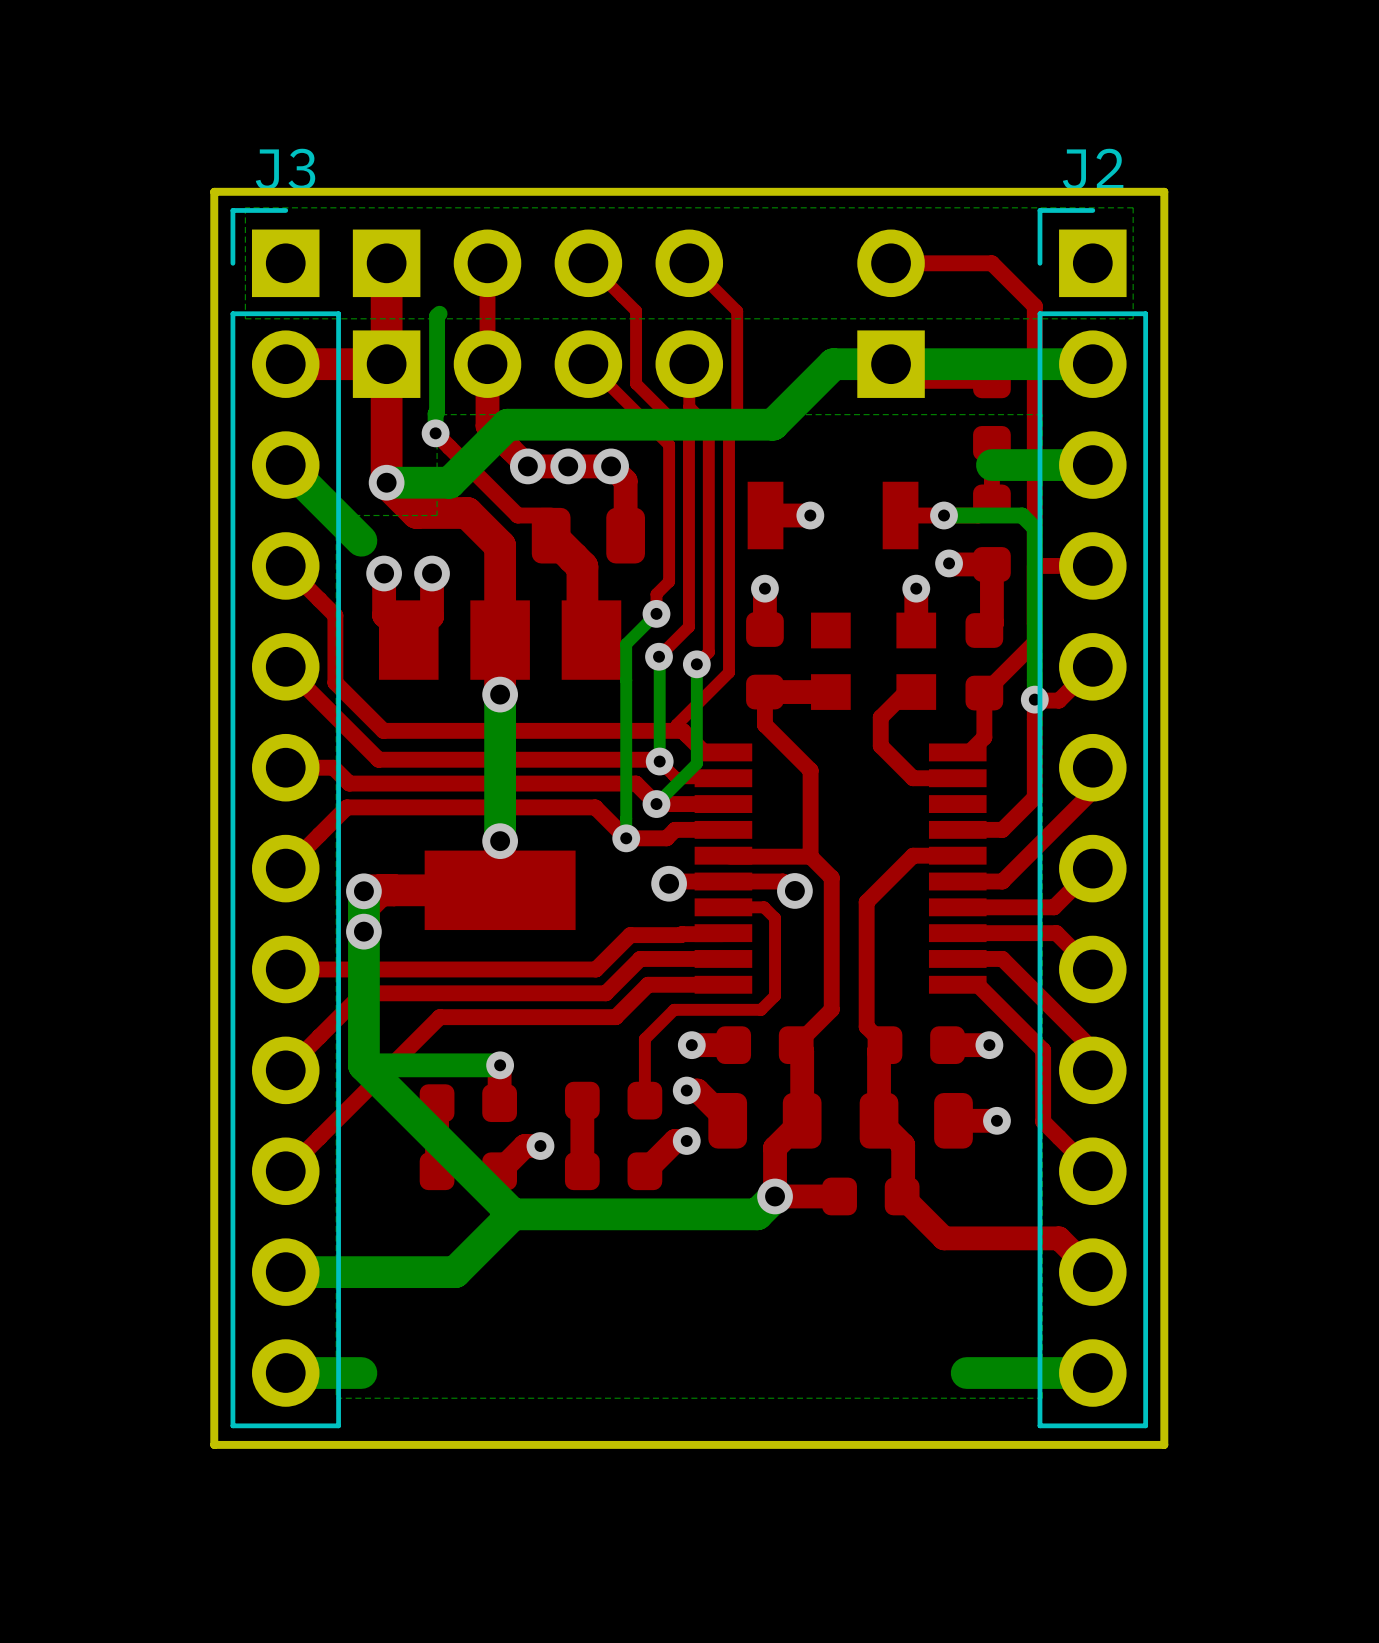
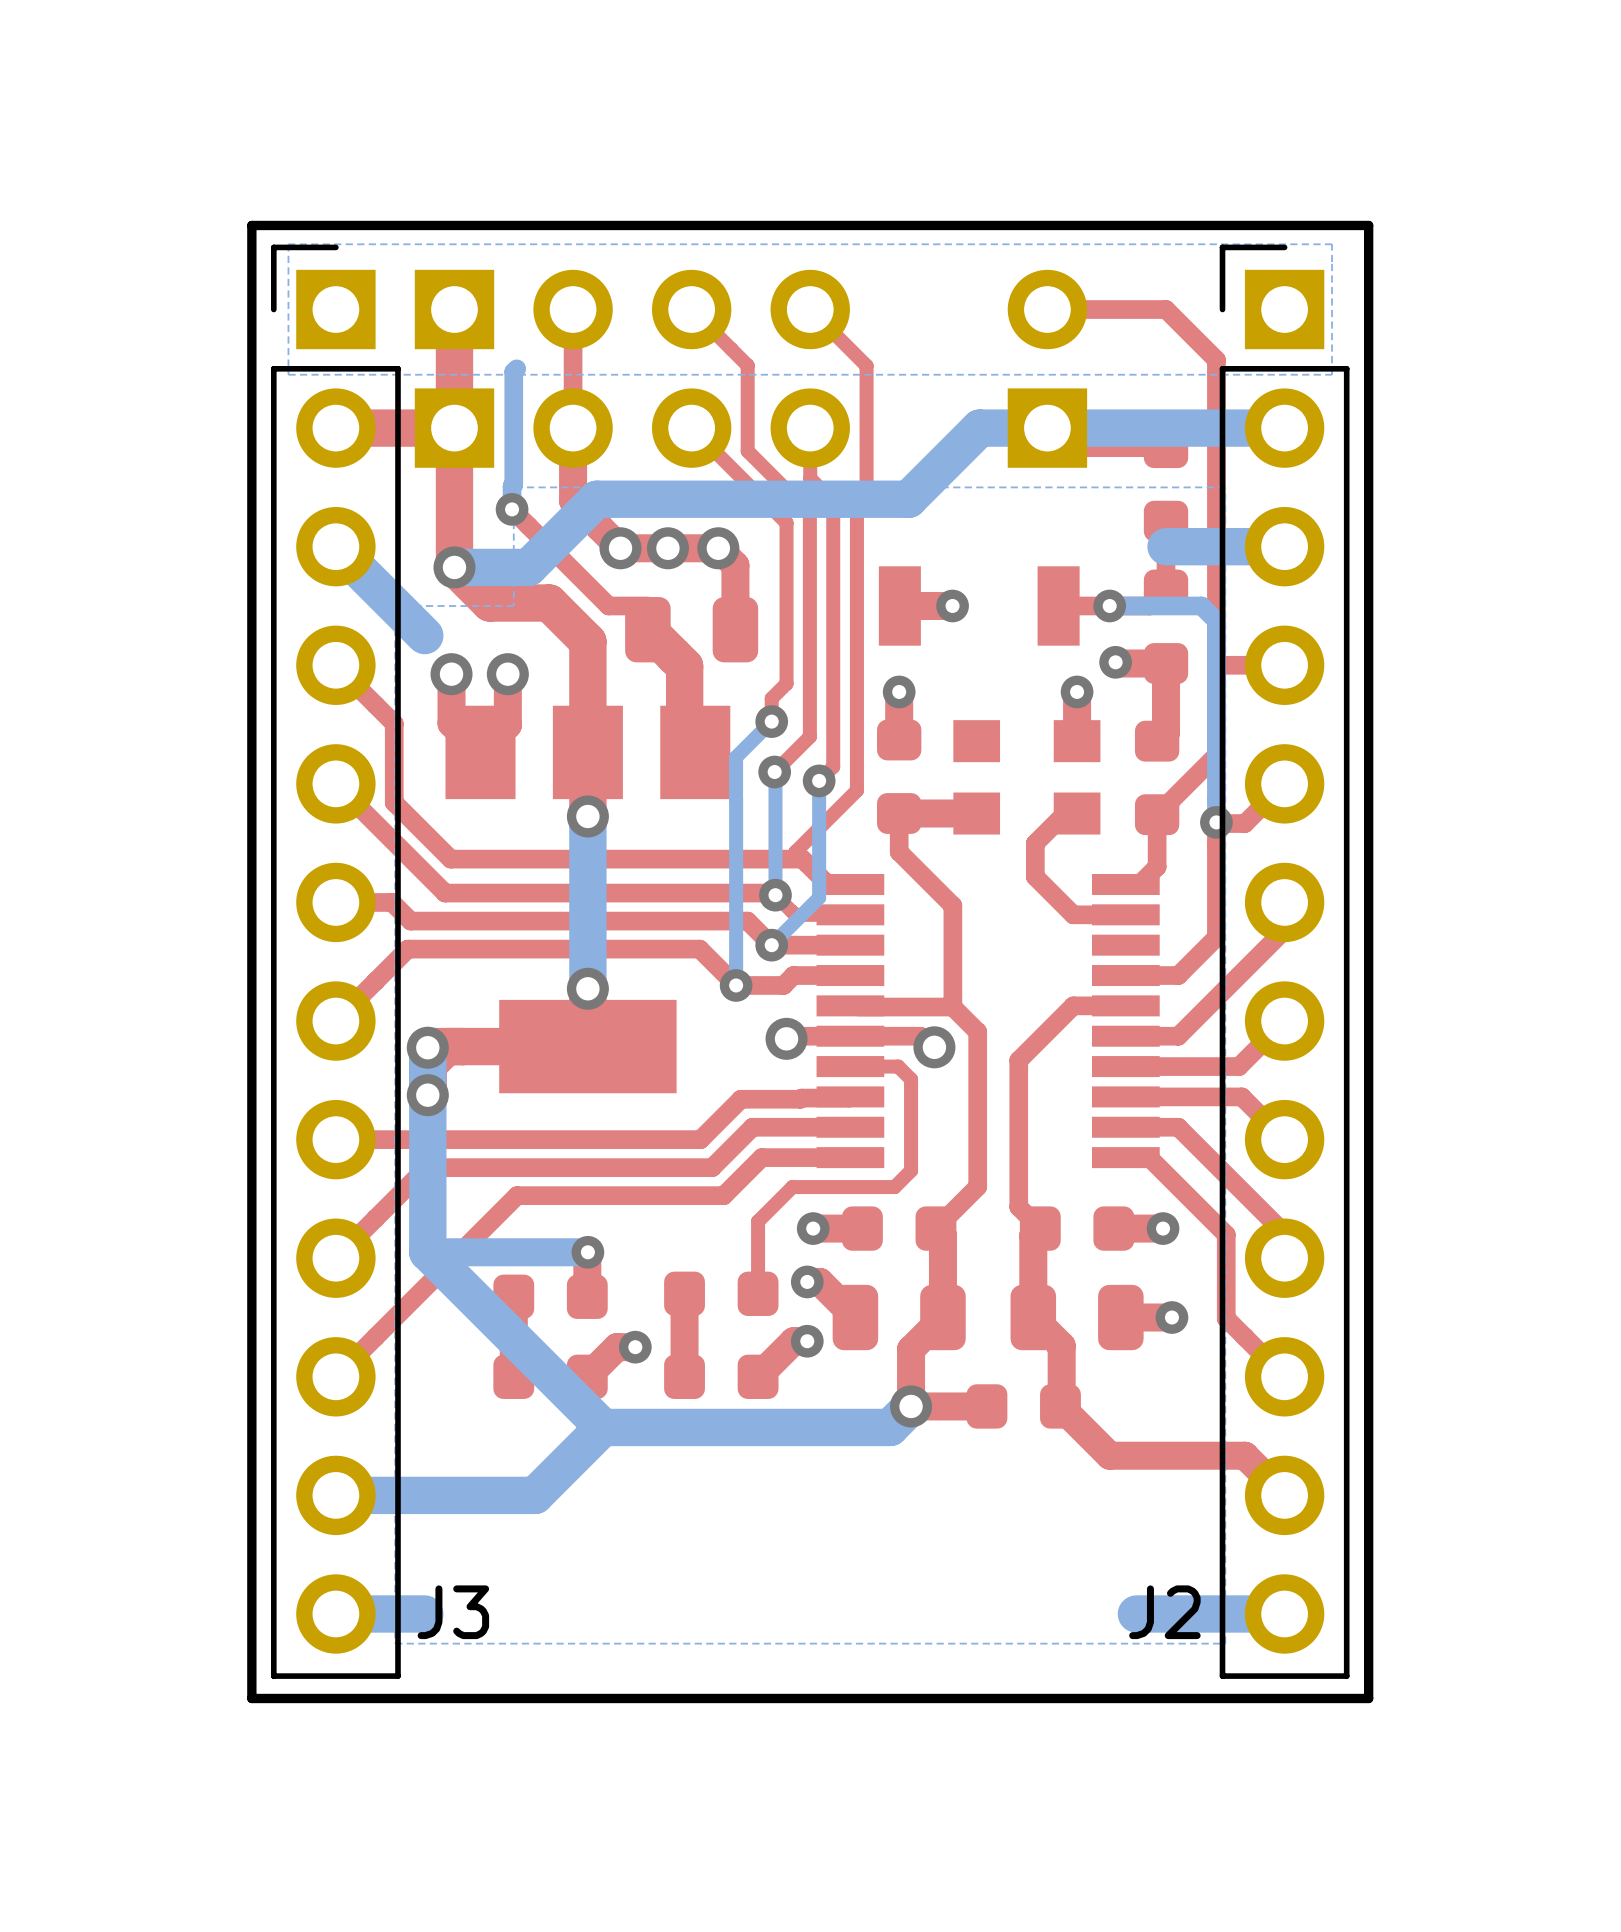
J3 name position: J3 (285, 169) -> J3 (453, 1612)
J2 name position: J2 (1093, 169) -> J2 (1164, 1612)

